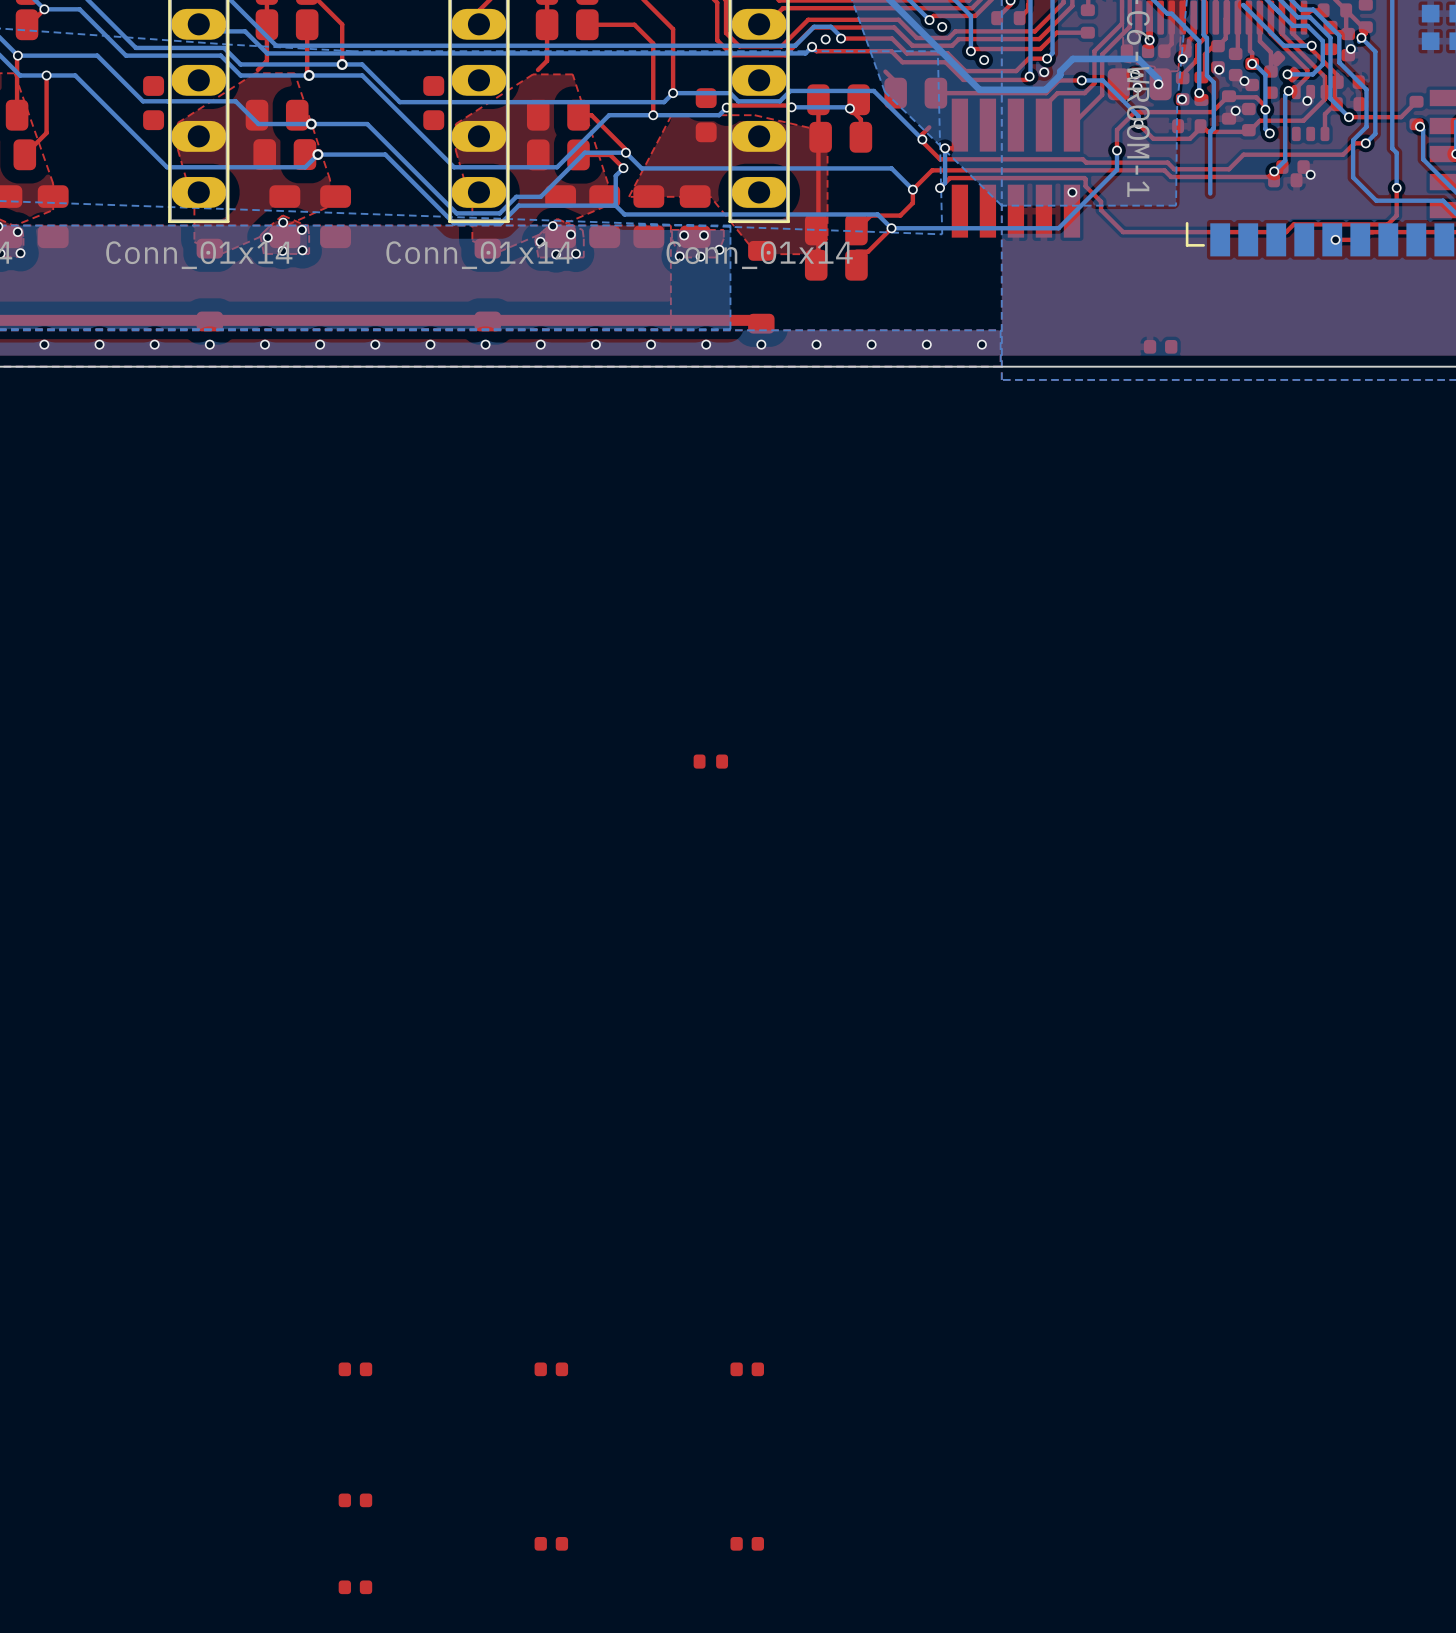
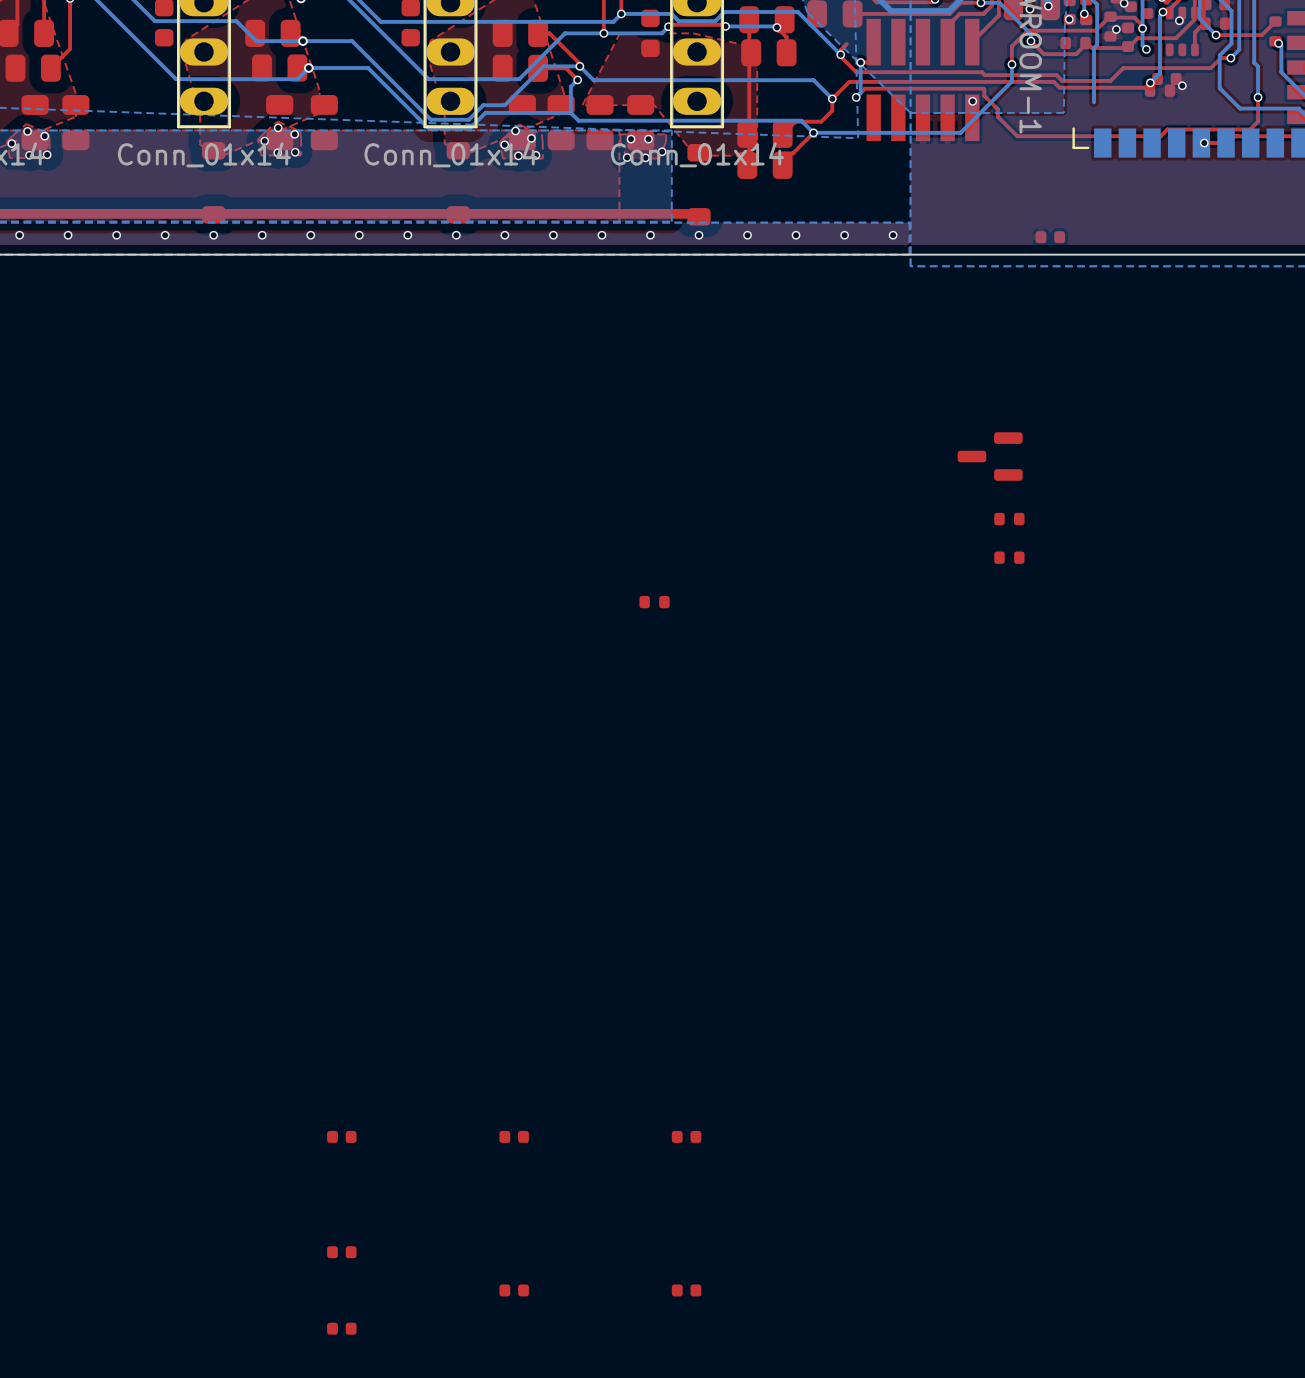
part: none -> (990, 456)
part: none -> (1009, 519)
part: none -> (1009, 557)

